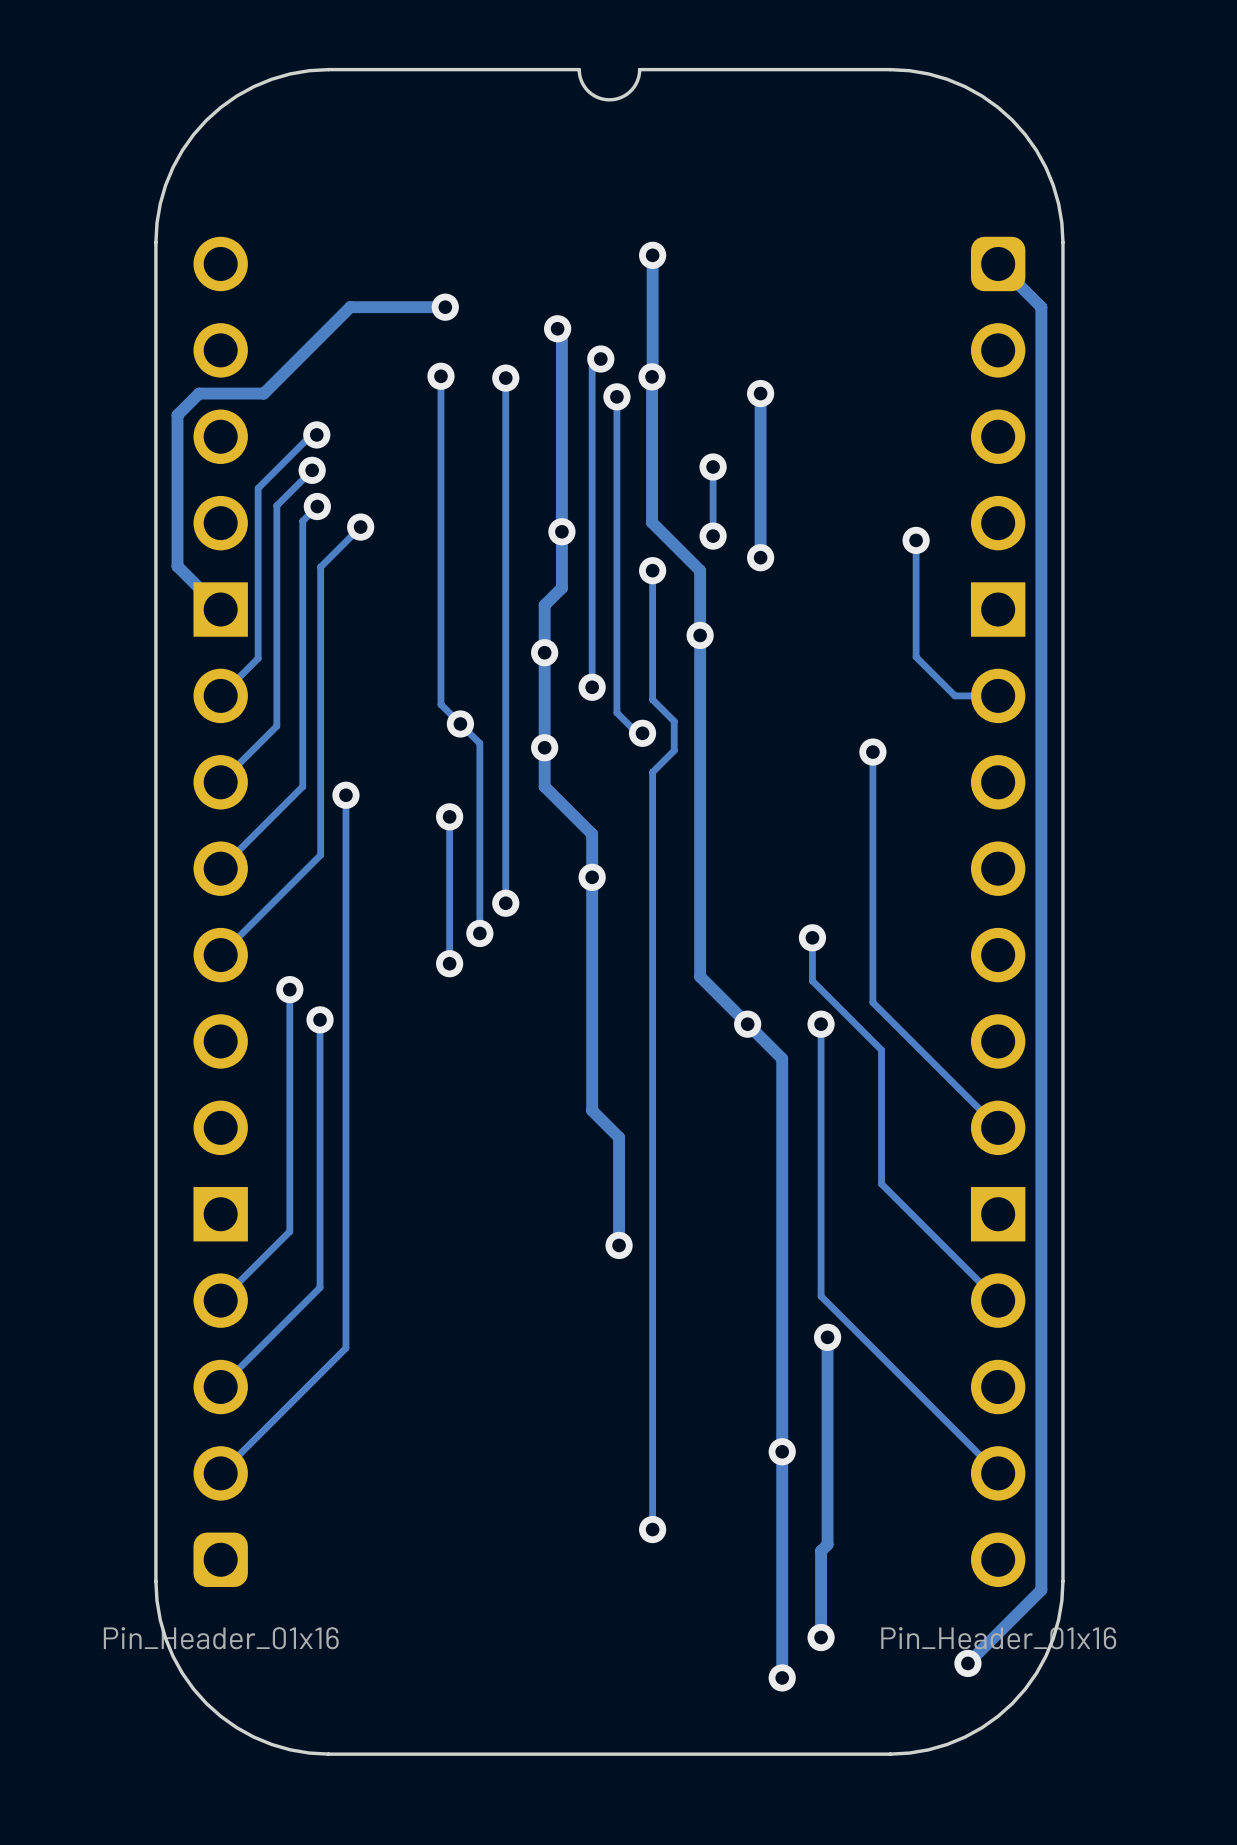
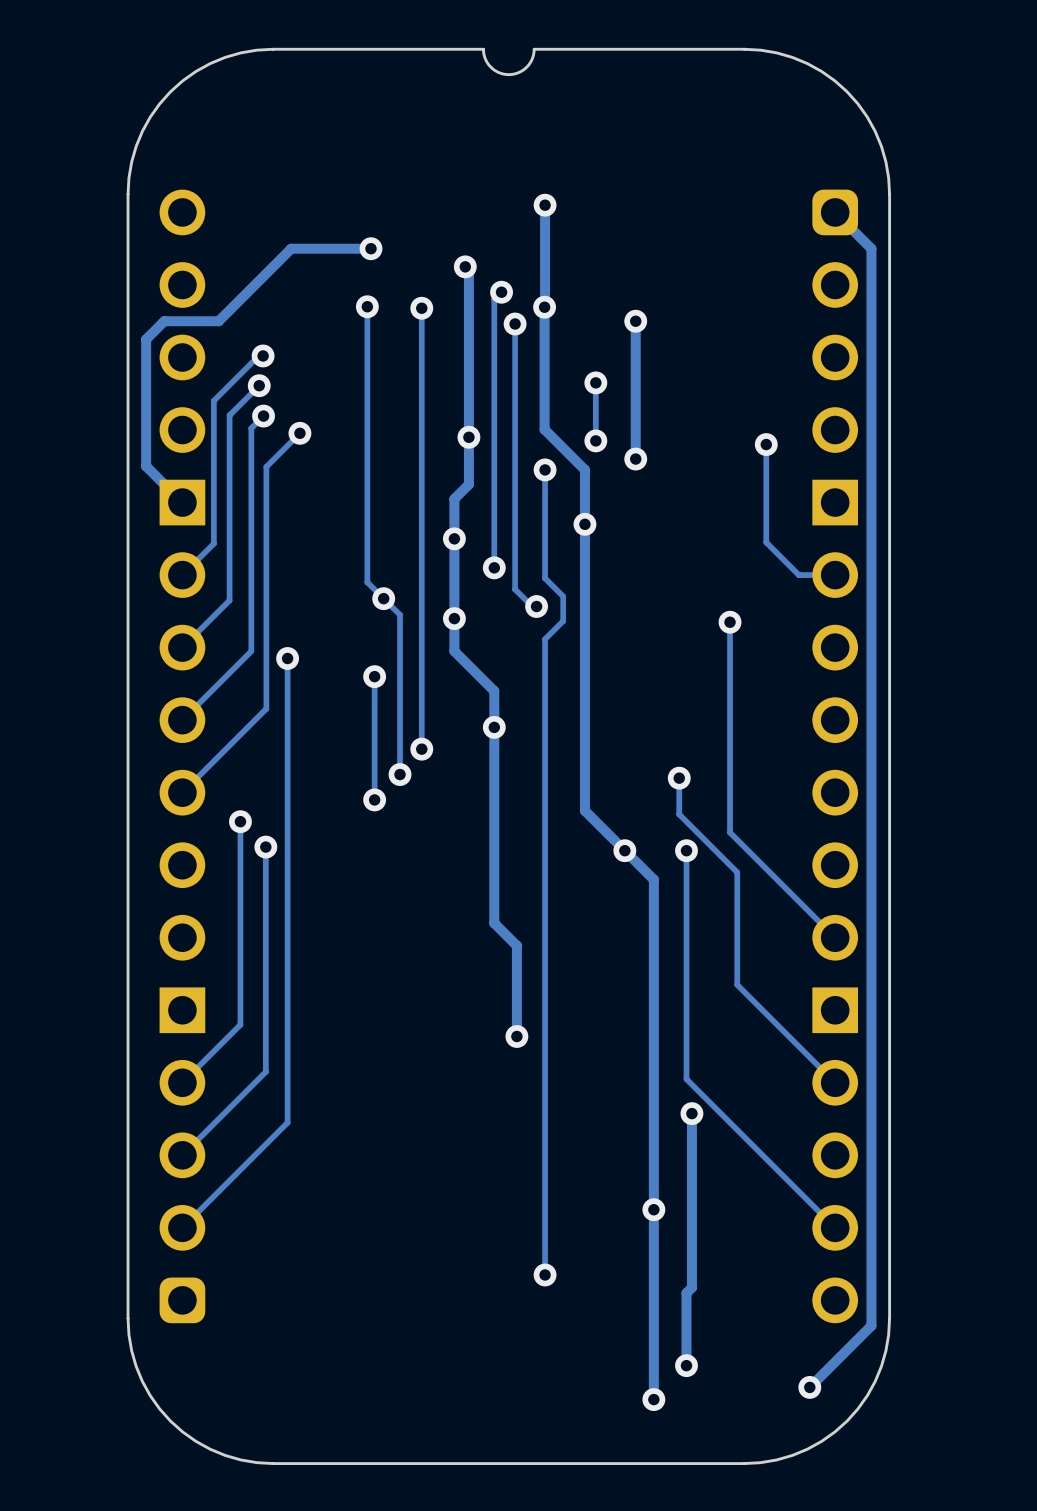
drawing: [103, 1627, 339, 1650] -> none
drawing: [881, 1627, 1117, 1650] -> none

